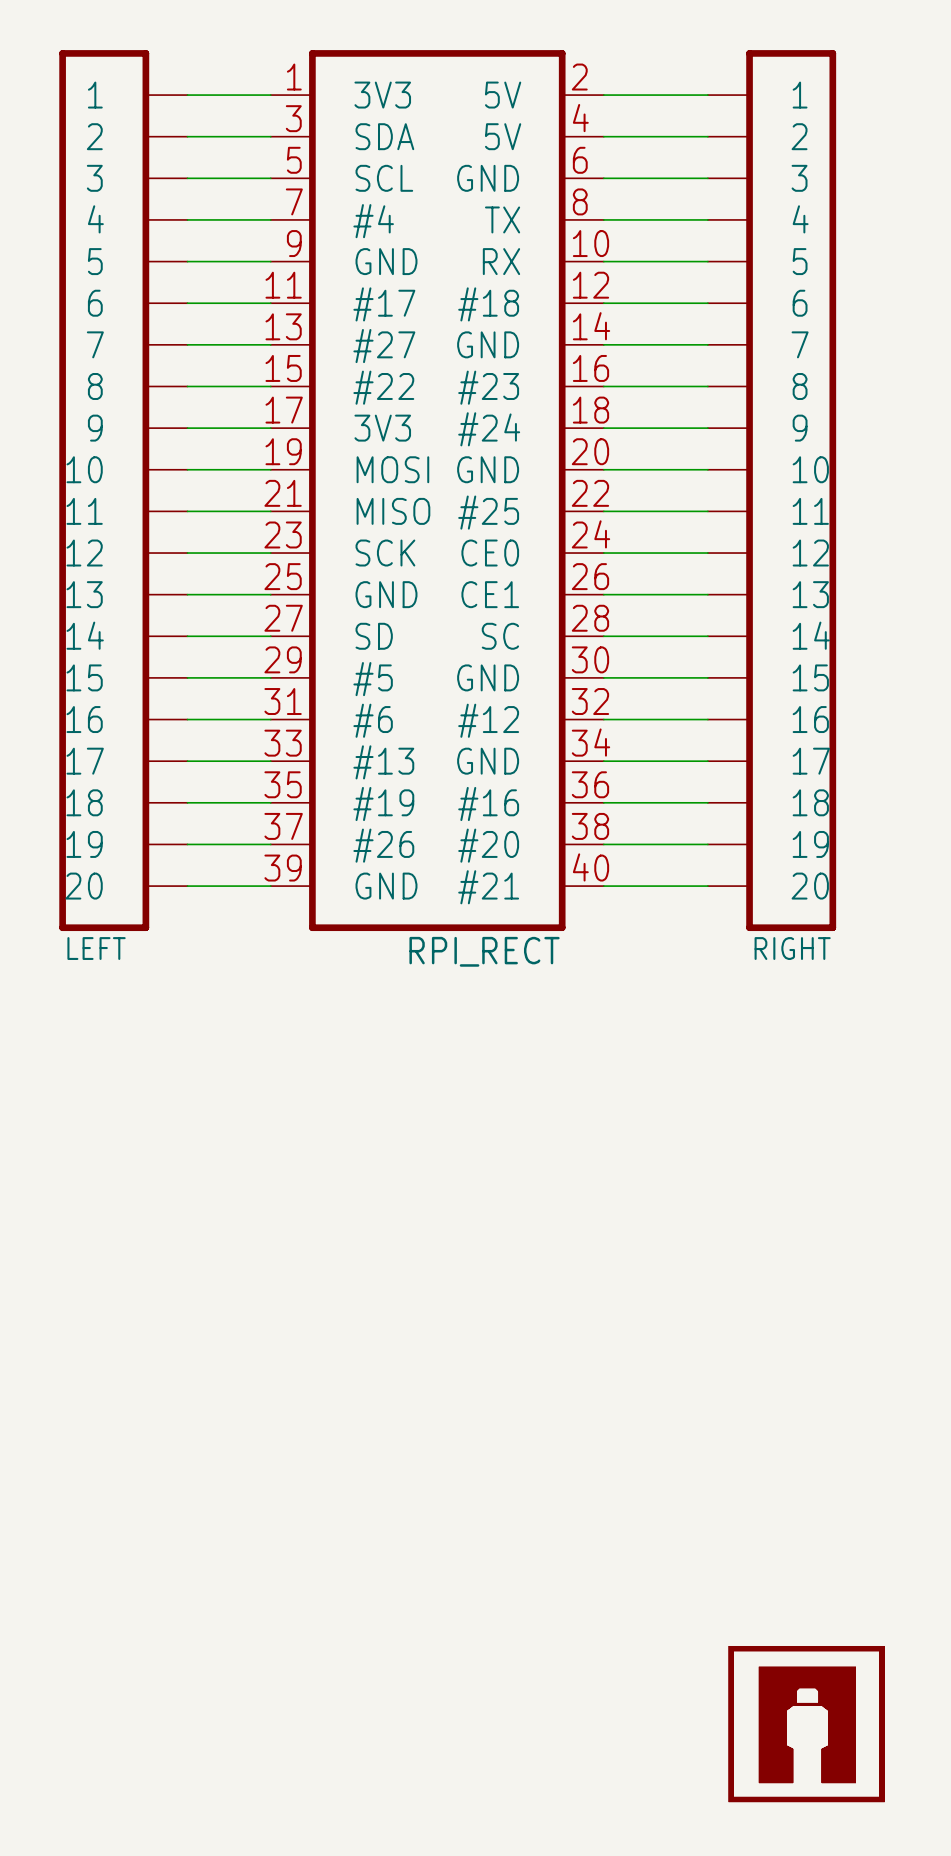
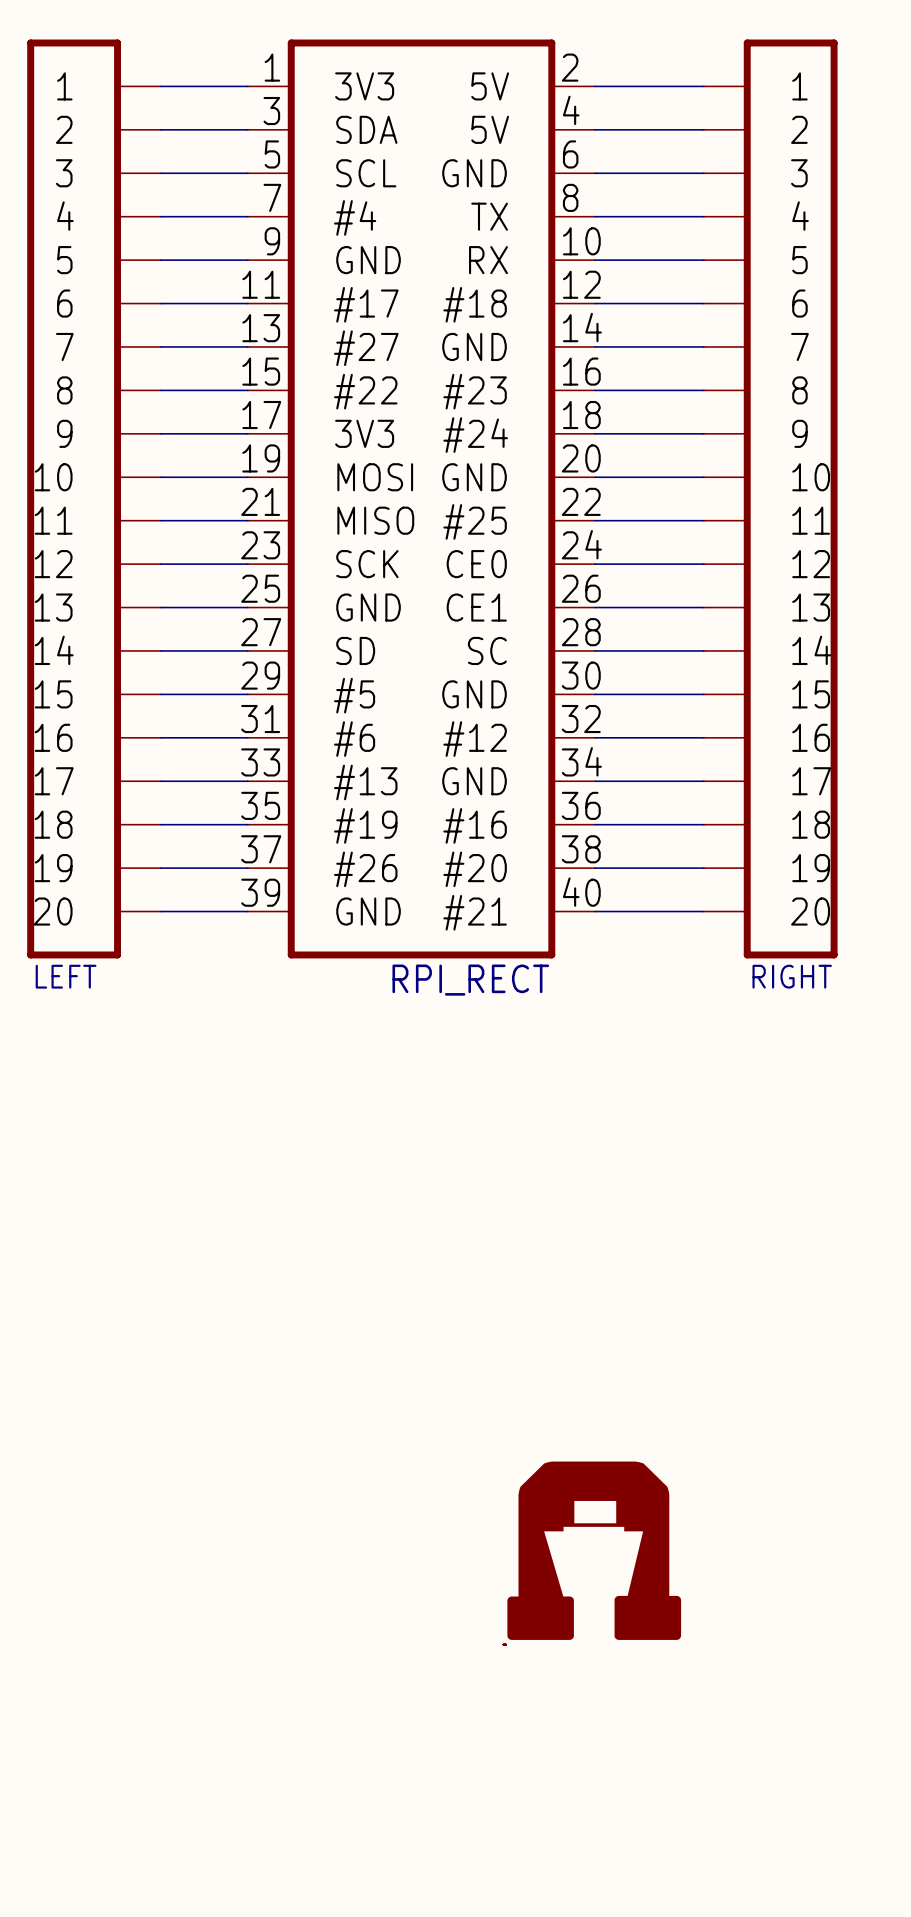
part: none -> (594, 1550)
part: (806, 1724) -> none

